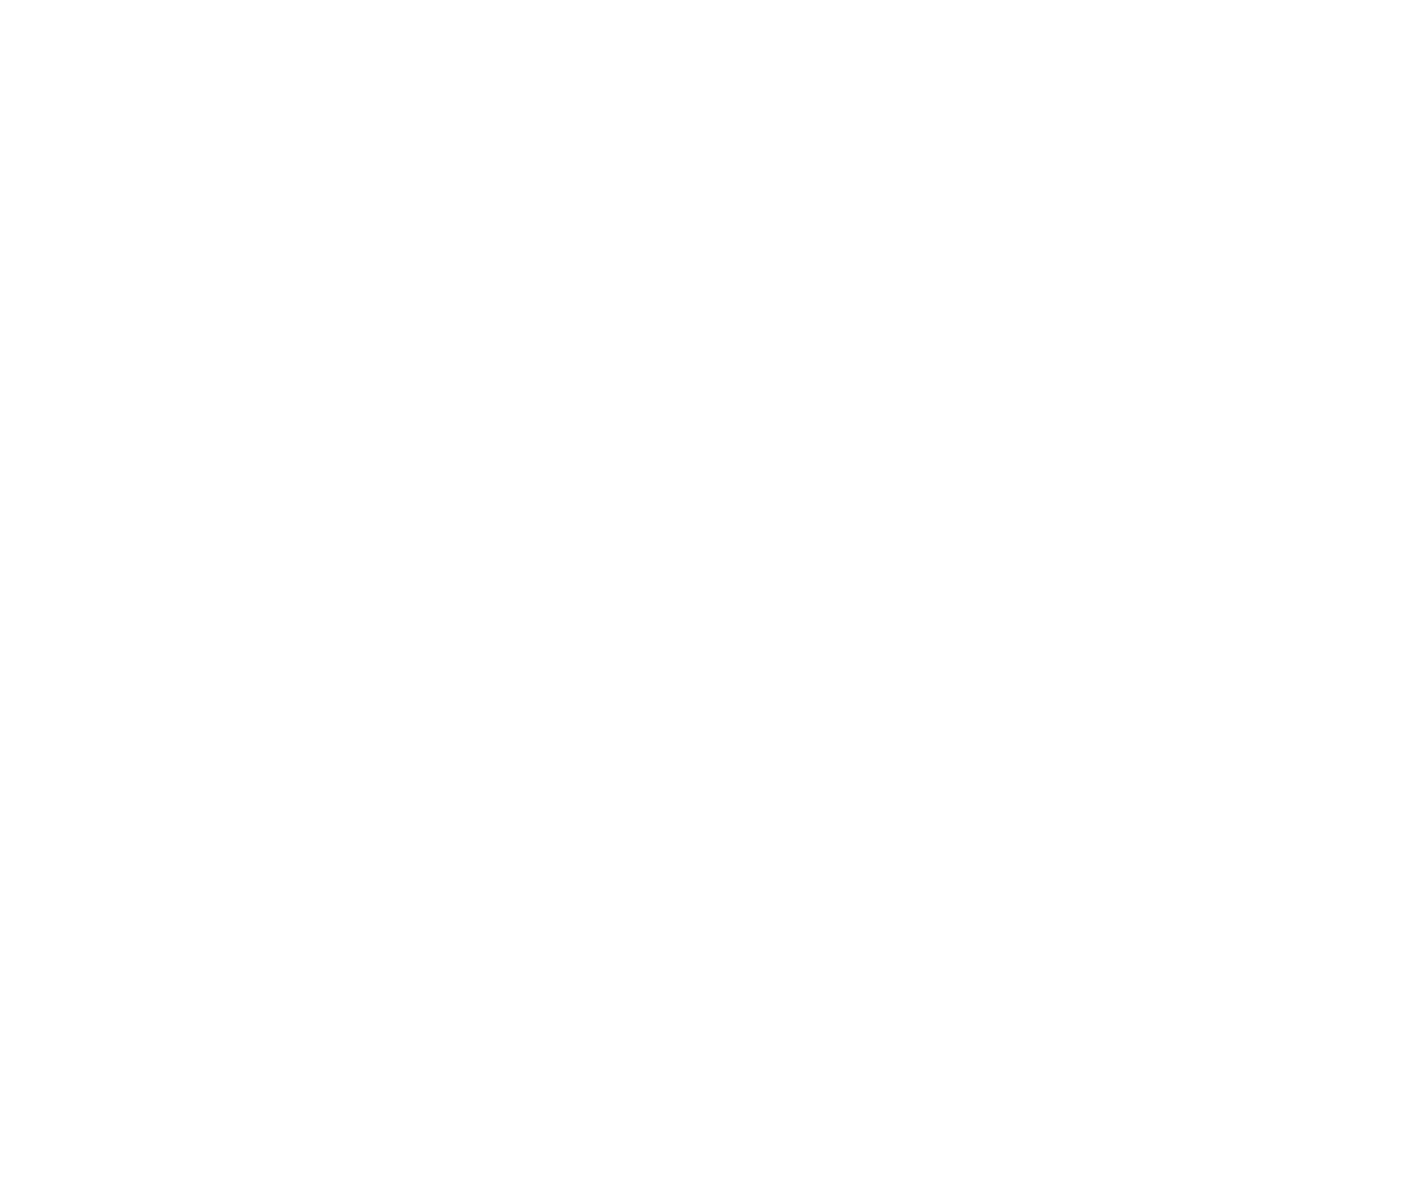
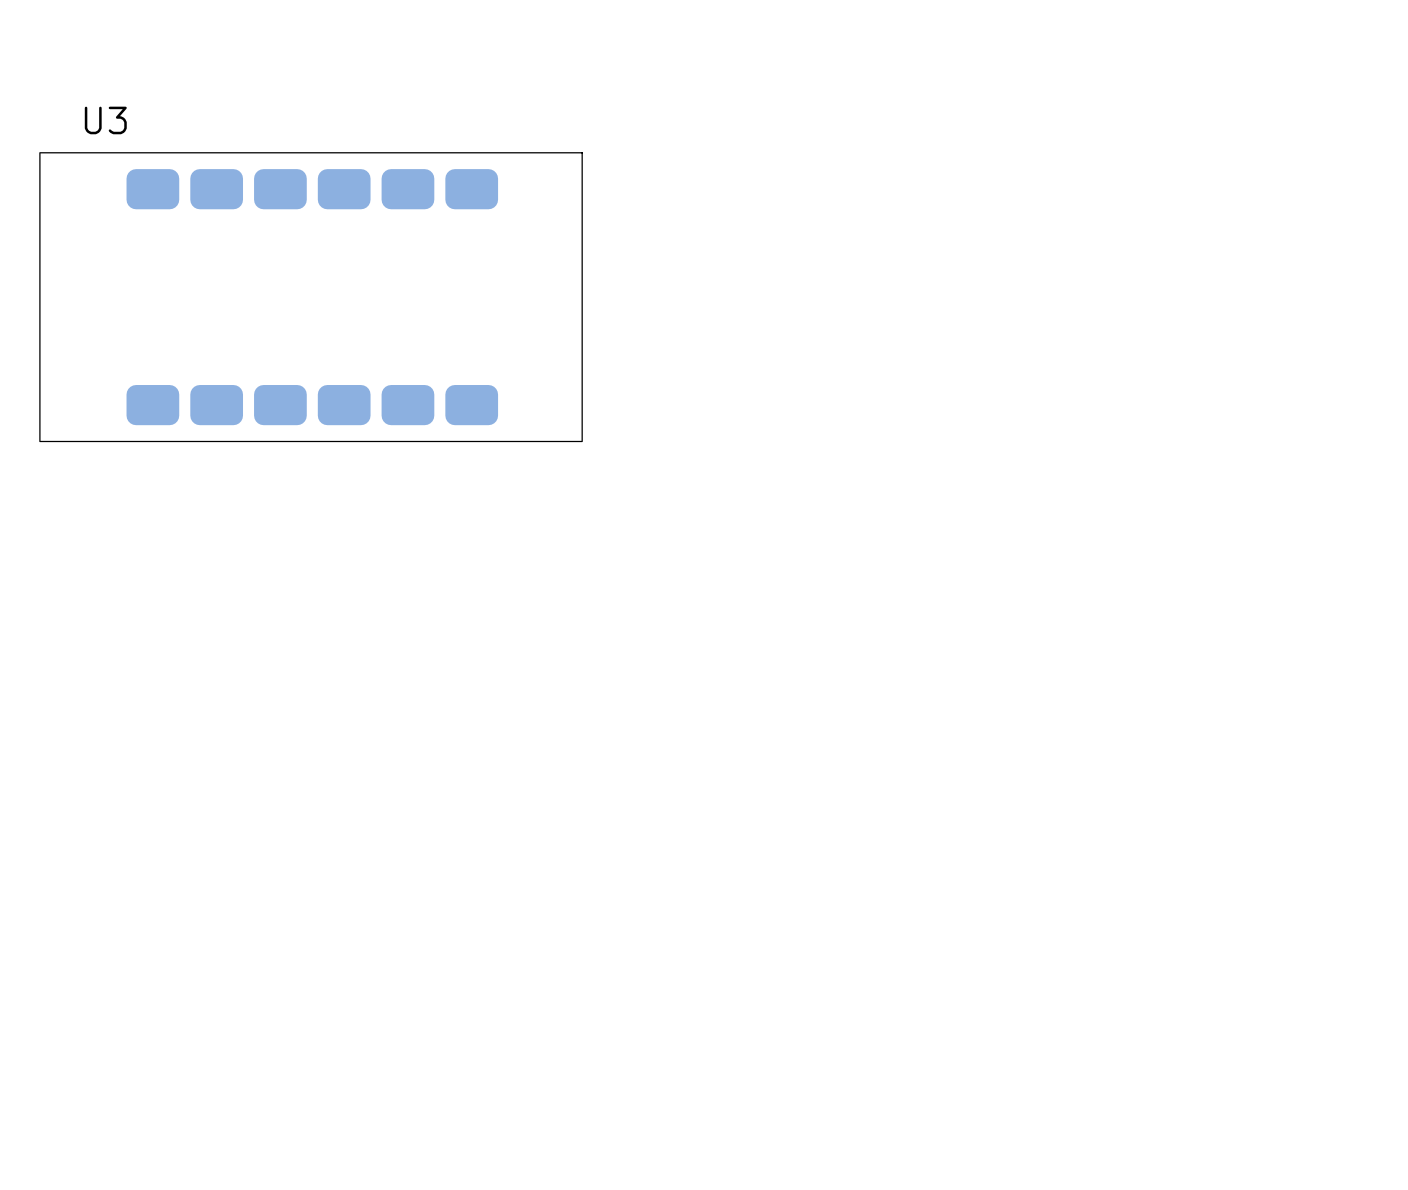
U3: none -> (311, 297)

